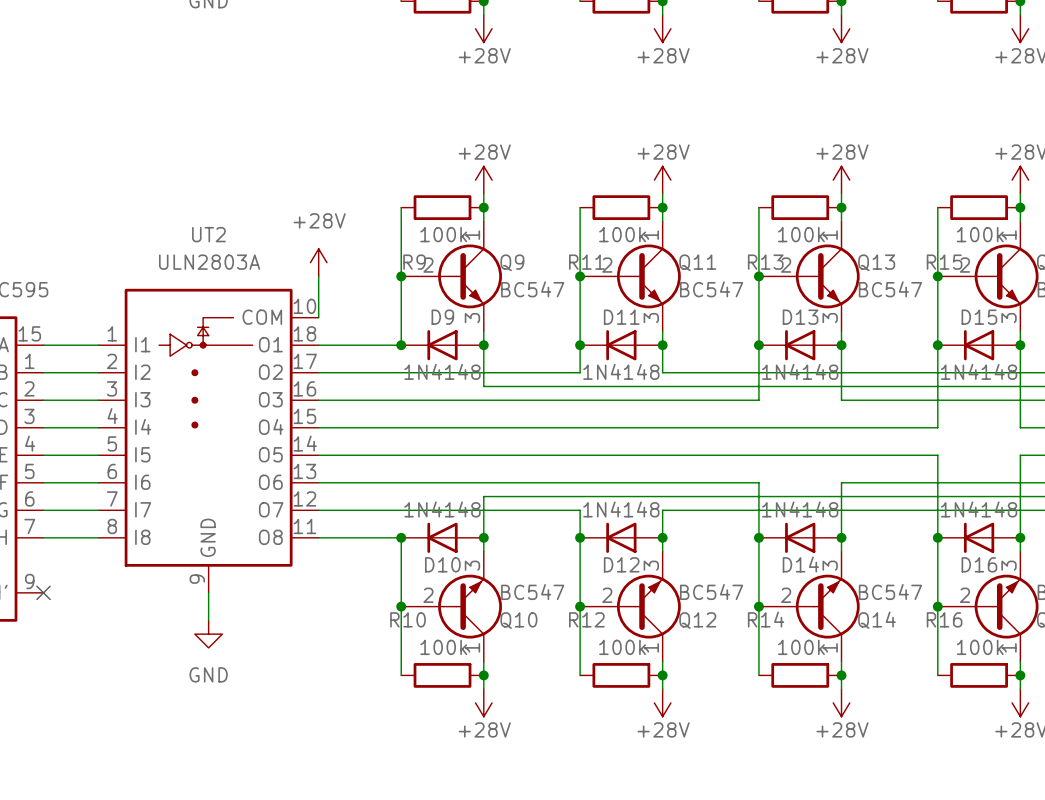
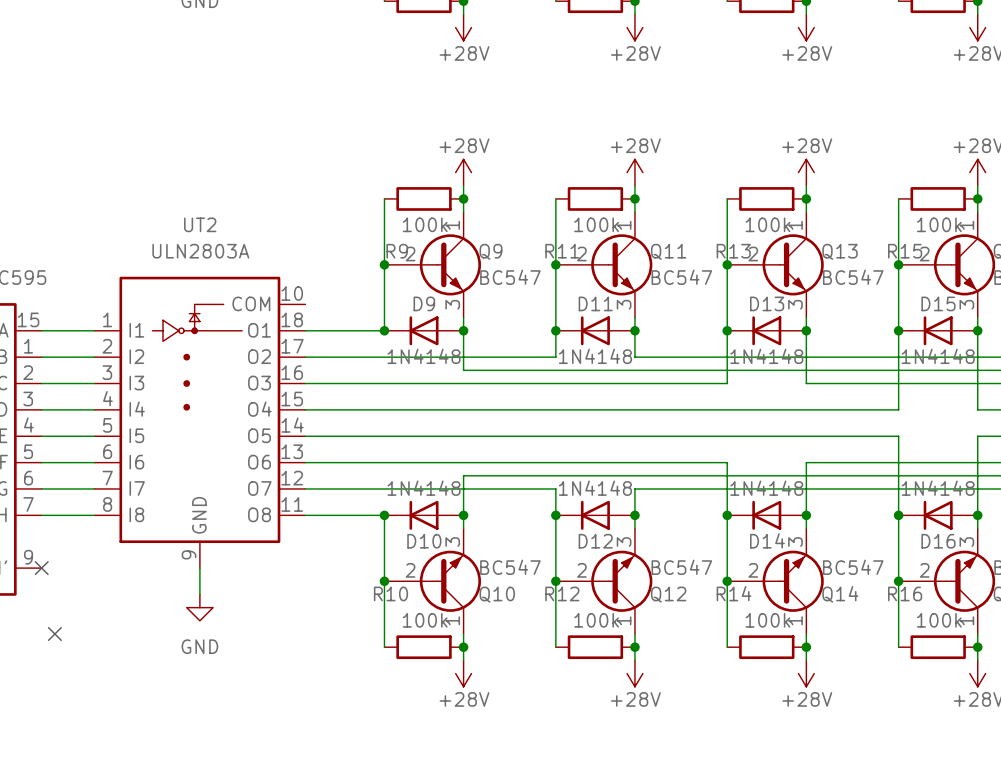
power symbol: +28V (318, 262) -> none
wire: (318, 276) (318, 317) -> none
no-connect mark: none -> (54, 634)

